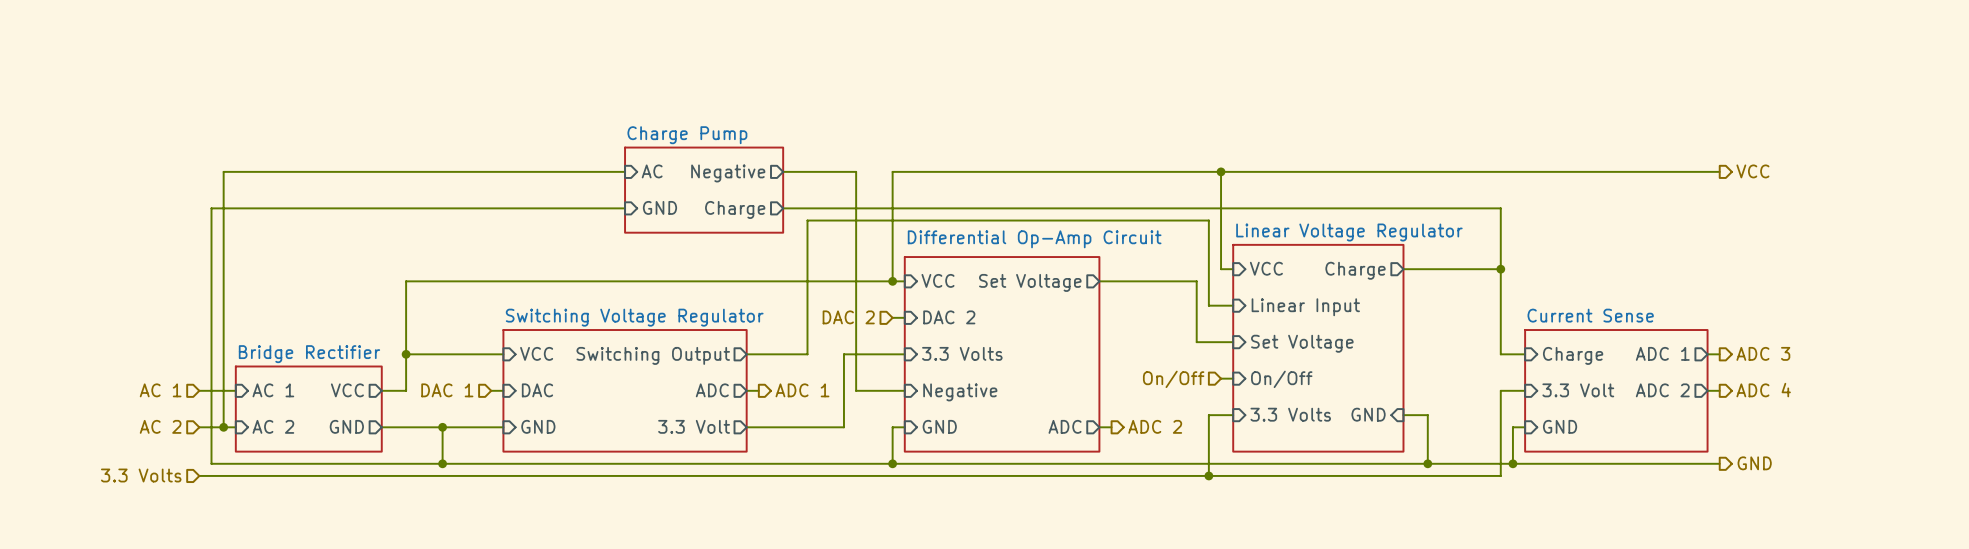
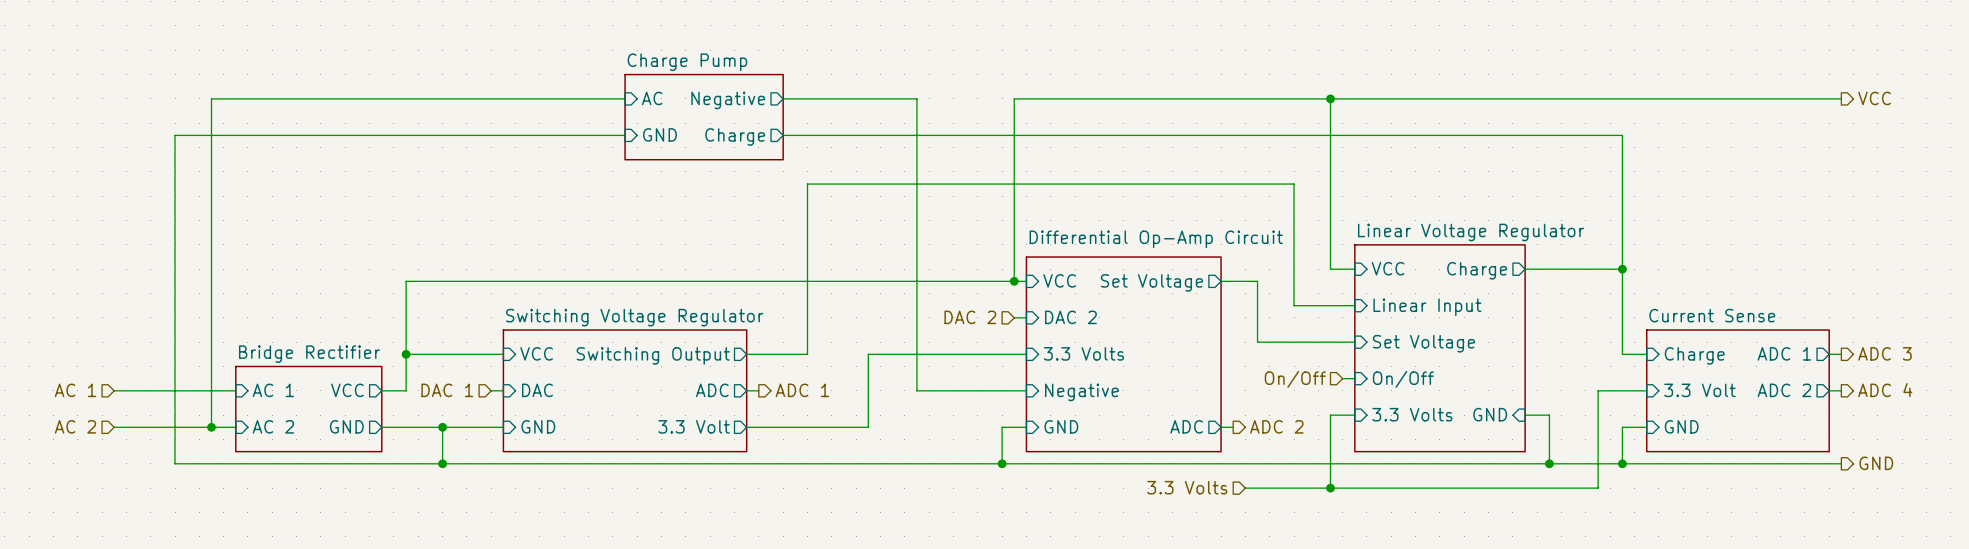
wire: none -> (783, 98) (916, 98) (916, 390) (1026, 390)
wire: none -> (1330, 98) (1330, 269) (1354, 269)
junction: none -> (1330, 98)
wire: none -> (1841, 98) (1014, 98) (1014, 281)
wire: none -> (783, 135) (1622, 135) (1622, 354) (1646, 354)
wire: (625, 171) (223, 171) (223, 427) -> none
sheet pin position: AC (652, 171) -> AC (652, 98)
wire: (783, 171) (856, 171) (856, 390) (904, 390) -> none
wire: (1221, 171) (1221, 269) (1233, 269) -> none
junction: (1221, 171) -> none
wire: (1719, 171) (892, 171) (892, 281) -> none
hierarchical label position: VCC (1752, 171) -> VCC (1874, 98)
sheet pin position: Negative (728, 173) -> Negative (728, 100)
sheet Charge Pump position: (704, 190) -> (704, 117)
sheet pin position: GND (659, 207) -> GND (659, 134)
wire: (211, 208) (625, 208) -> (211, 208) (211, 98) (625, 98)
wire: (783, 208) (1500, 208) (1500, 354) (1525, 354) -> none
sheet pin position: Charge (735, 209) -> Charge (735, 136)
wire: (807, 220) (1208, 220) (1208, 305) (1233, 305) -> (807, 220) (807, 184) (1294, 184) (1294, 305) (1354, 305)
sheet pin: VCC (1266, 268) -> none
sheet pin: none -> VCC (1388, 268)
wire: (1403, 269) (1500, 269) -> (1525, 269) (1622, 269)
junction: (1500, 269) -> none
junction: none -> (1622, 269)
sheet pin: Charge (1355, 270) -> none
sheet pin: none -> Charge (1477, 270)
sheet pin: VCC (938, 280) -> none
sheet pin: none -> VCC (1059, 280)
junction: (892, 281) -> none
wire: none -> (904, 281) (1026, 281)
junction: none -> (1014, 281)
wire: (1099, 281) (1196, 281) (1196, 342) (1233, 342) -> none
wire: none -> (1221, 281) (1257, 281) (1257, 342) (1354, 342)
sheet pin position: Set Voltage (1030, 282) -> Set Voltage (1151, 282)
sheet pin position: Linear Input (1305, 307) -> Linear Input (1427, 307)
hierarchical label position: DAC 2 (848, 317) -> DAC 2 (970, 317)
wire: (892, 317) (904, 317) -> (1014, 317) (1026, 317)
sheet pin position: DAC 2 (949, 317) -> DAC 2 (1070, 317)
sheet pin position: Set Voltage (1302, 343) -> Set Voltage (1423, 343)
sheet Linear Voltage Regulator position: (1318, 348) -> (1439, 348)
sheet pin: 3.3 Volts (962, 353) -> none
sheet pin: none -> 3.3 Volts (1083, 353)
sheet pin position: ADC 1 (1662, 353) -> ADC 1 (1784, 353)
hierarchical label position: ADC 3 (1763, 353) -> ADC 3 (1884, 353)
wire: (868, 354) (843, 354) (843, 427) -> (868, 354) (868, 427) (843, 427)
wire: none -> (904, 354) (1026, 354)
sheet Differential Op-Amp Circuit position: (1002, 354) -> (1123, 354)
wire: (1707, 354) (1719, 354) -> (1829, 354) (1841, 354)
sheet pin: Charge (1573, 355) -> none
sheet pin: none -> Charge (1694, 355)
wire: (1221, 378) (1233, 378) -> (1342, 378) (1354, 378)
hierarchical label position: On/Off (1173, 379) -> On/Off (1295, 379)
sheet pin position: On/Off (1281, 379) -> On/Off (1403, 379)
wire: none -> (114, 390) (199, 390)
hierarchical label position: AC 1 (160, 390) -> AC 1 (75, 390)
wire: (1525, 390) (1500, 390) (1500, 475) (199, 475) -> none
sheet pin position: 3.3 Volt (1578, 390) -> 3.3 Volt (1699, 390)
sheet Current Sense position: (1616, 390) -> (1737, 390)
wire: none -> (1646, 390) (1598, 390) (1598, 488) (1245, 488)
sheet pin position: ADC 2 (1662, 390) -> ADC 2 (1784, 390)
wire: (1707, 390) (1719, 390) -> (1829, 390) (1841, 390)
hierarchical label position: ADC 4 (1763, 390) -> ADC 4 (1885, 390)
sheet pin position: Negative (960, 392) -> Negative (1081, 392)
sheet pin: 3.3 Volts (1290, 414) -> none
sheet pin: GND (1368, 414) -> none
sheet pin: none -> 3.3 Volts (1412, 414)
wire: (1233, 415) (1208, 415) (1208, 475) -> none
wire: none -> (1354, 415) (1330, 415) (1330, 488)
wire: (1403, 415) (1427, 415) (1427, 463) -> (1525, 415) (1549, 415) (1549, 463)
hierarchical label position: AC 2 (160, 426) -> AC 2 (75, 426)
sheet pin position: GND (939, 426) -> GND (1061, 426)
sheet pin position: ADC (1065, 426) -> ADC (1186, 426)
hierarchical label position: ADC 2 (1155, 426) -> ADC 2 (1276, 426)
sheet pin rotation: 0° (1560, 426) -> 180° (1490, 414)
sheet pin position: GND (1560, 426) -> GND (1490, 414)
sheet pin: none -> GND (1681, 426)
wire: none -> (114, 427) (199, 427)
wire: (211, 427) (211, 463) -> (625, 135) (175, 135) (175, 463) (211, 463)
junction position: (223, 427) -> (211, 427)
wire: (904, 427) (892, 427) (892, 463) -> none
wire: none -> (1026, 427) (1002, 427) (1002, 463)
wire: (1099, 427) (1111, 427) -> (1221, 427) (1233, 427)
wire: (1525, 427) (1512, 427) (1512, 463) -> none
wire: none -> (1646, 427) (1622, 427) (1622, 463)
junction: (892, 463) -> none
junction: none -> (1002, 463)
junction: (1427, 463) -> none
junction position: (1512, 463) -> (1549, 463)
junction: none -> (1622, 463)
wire: none -> (1719, 463) (1841, 463)
hierarchical label position: GND (1754, 463) -> GND (1876, 463)
hierarchical label: 3.3 Volts (141, 475) -> none
junction: (1208, 475) -> none
hierarchical label: none -> 3.3 Volts (1187, 487)
junction: none -> (1330, 488)

